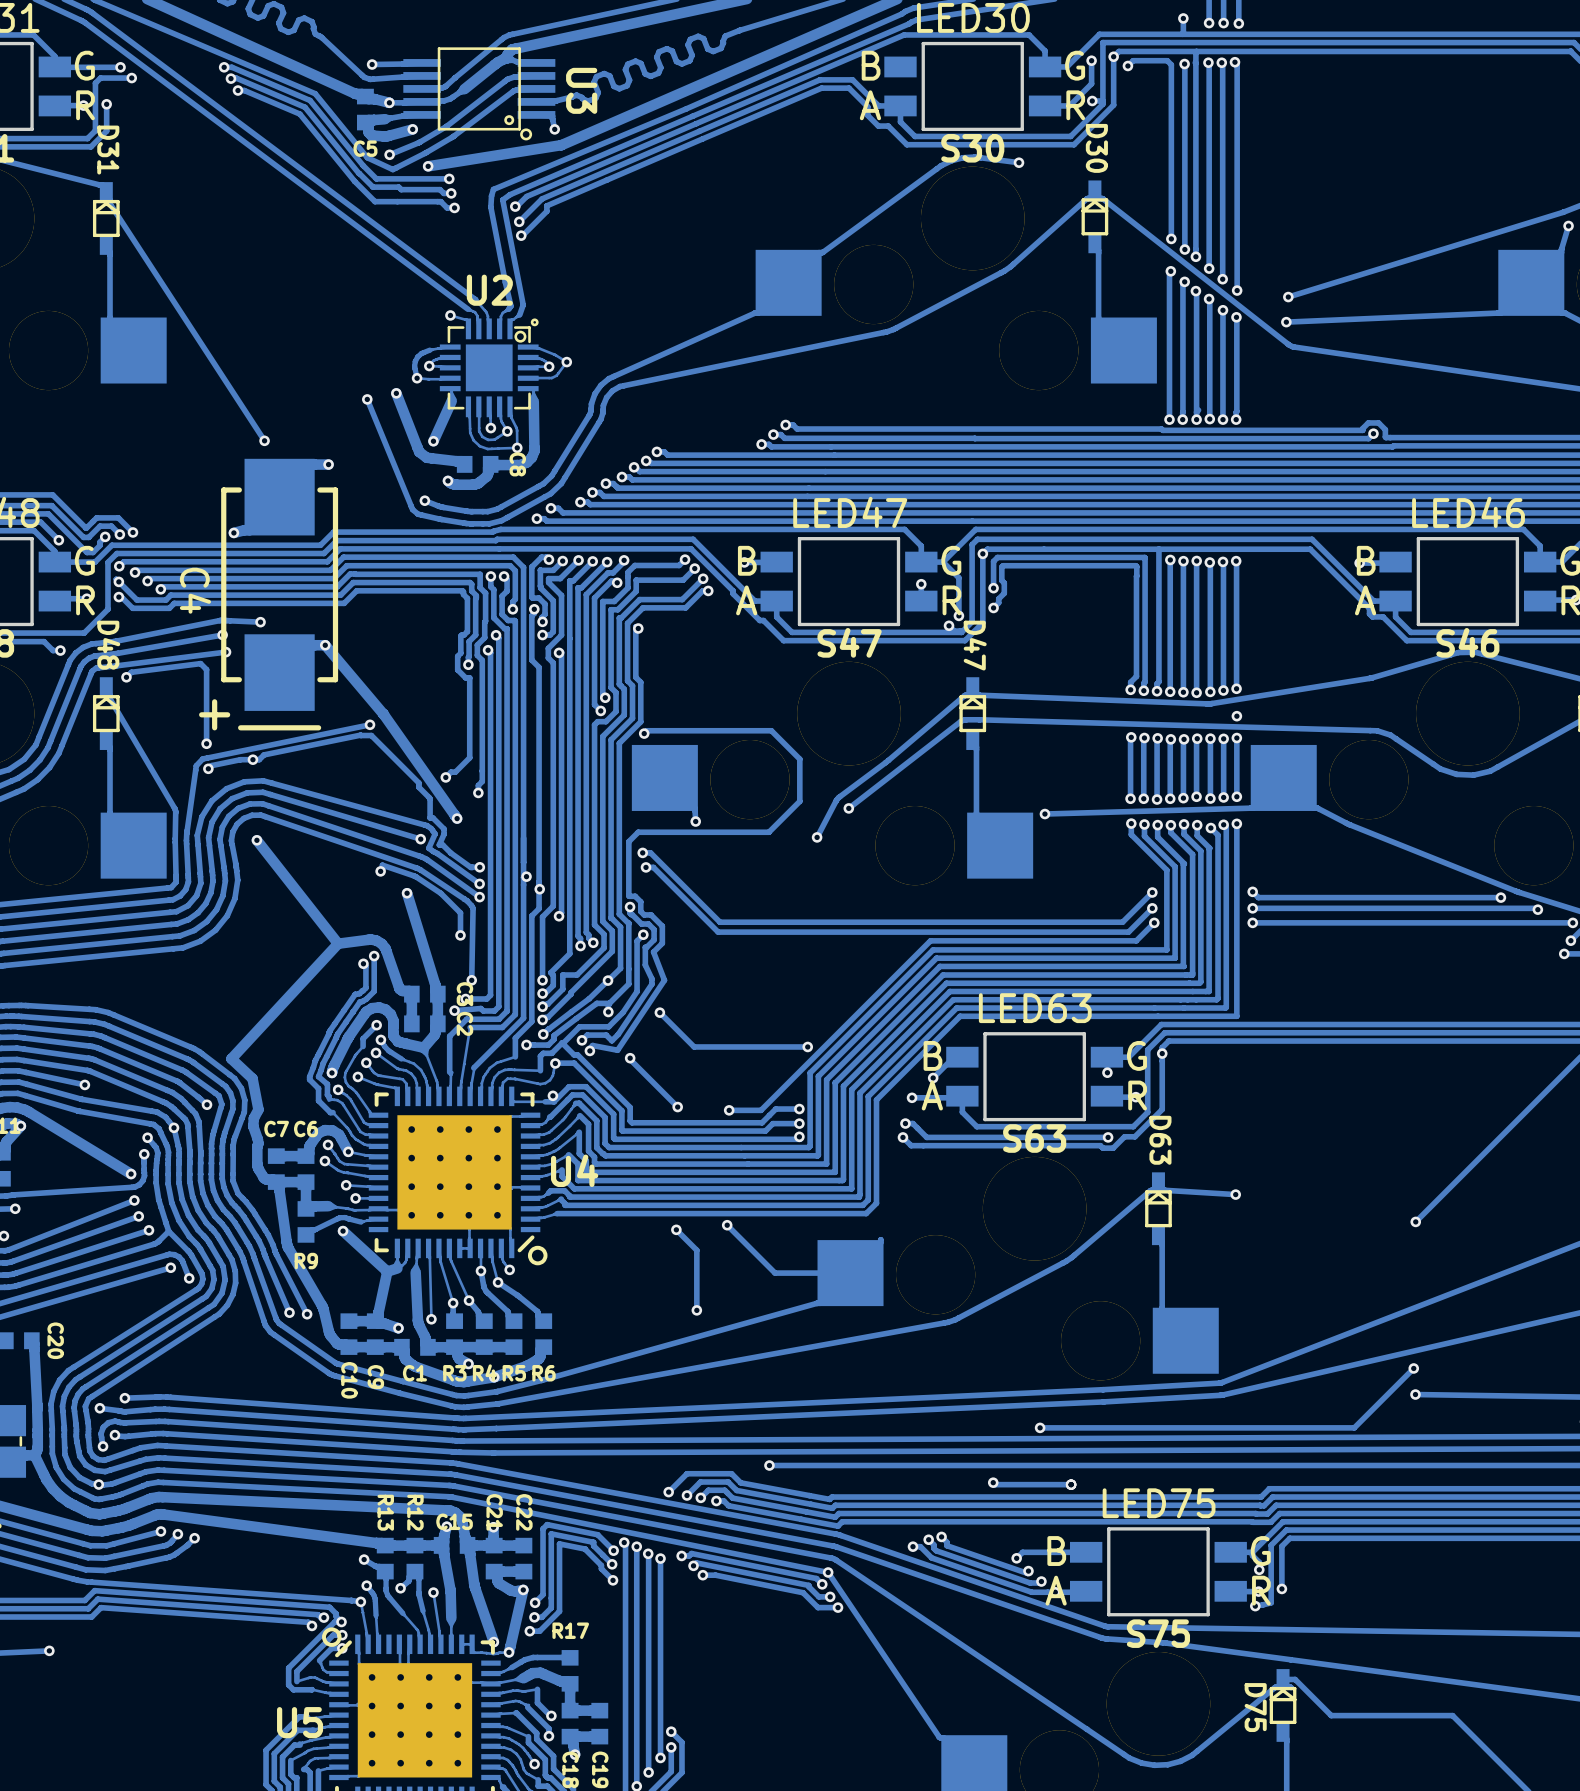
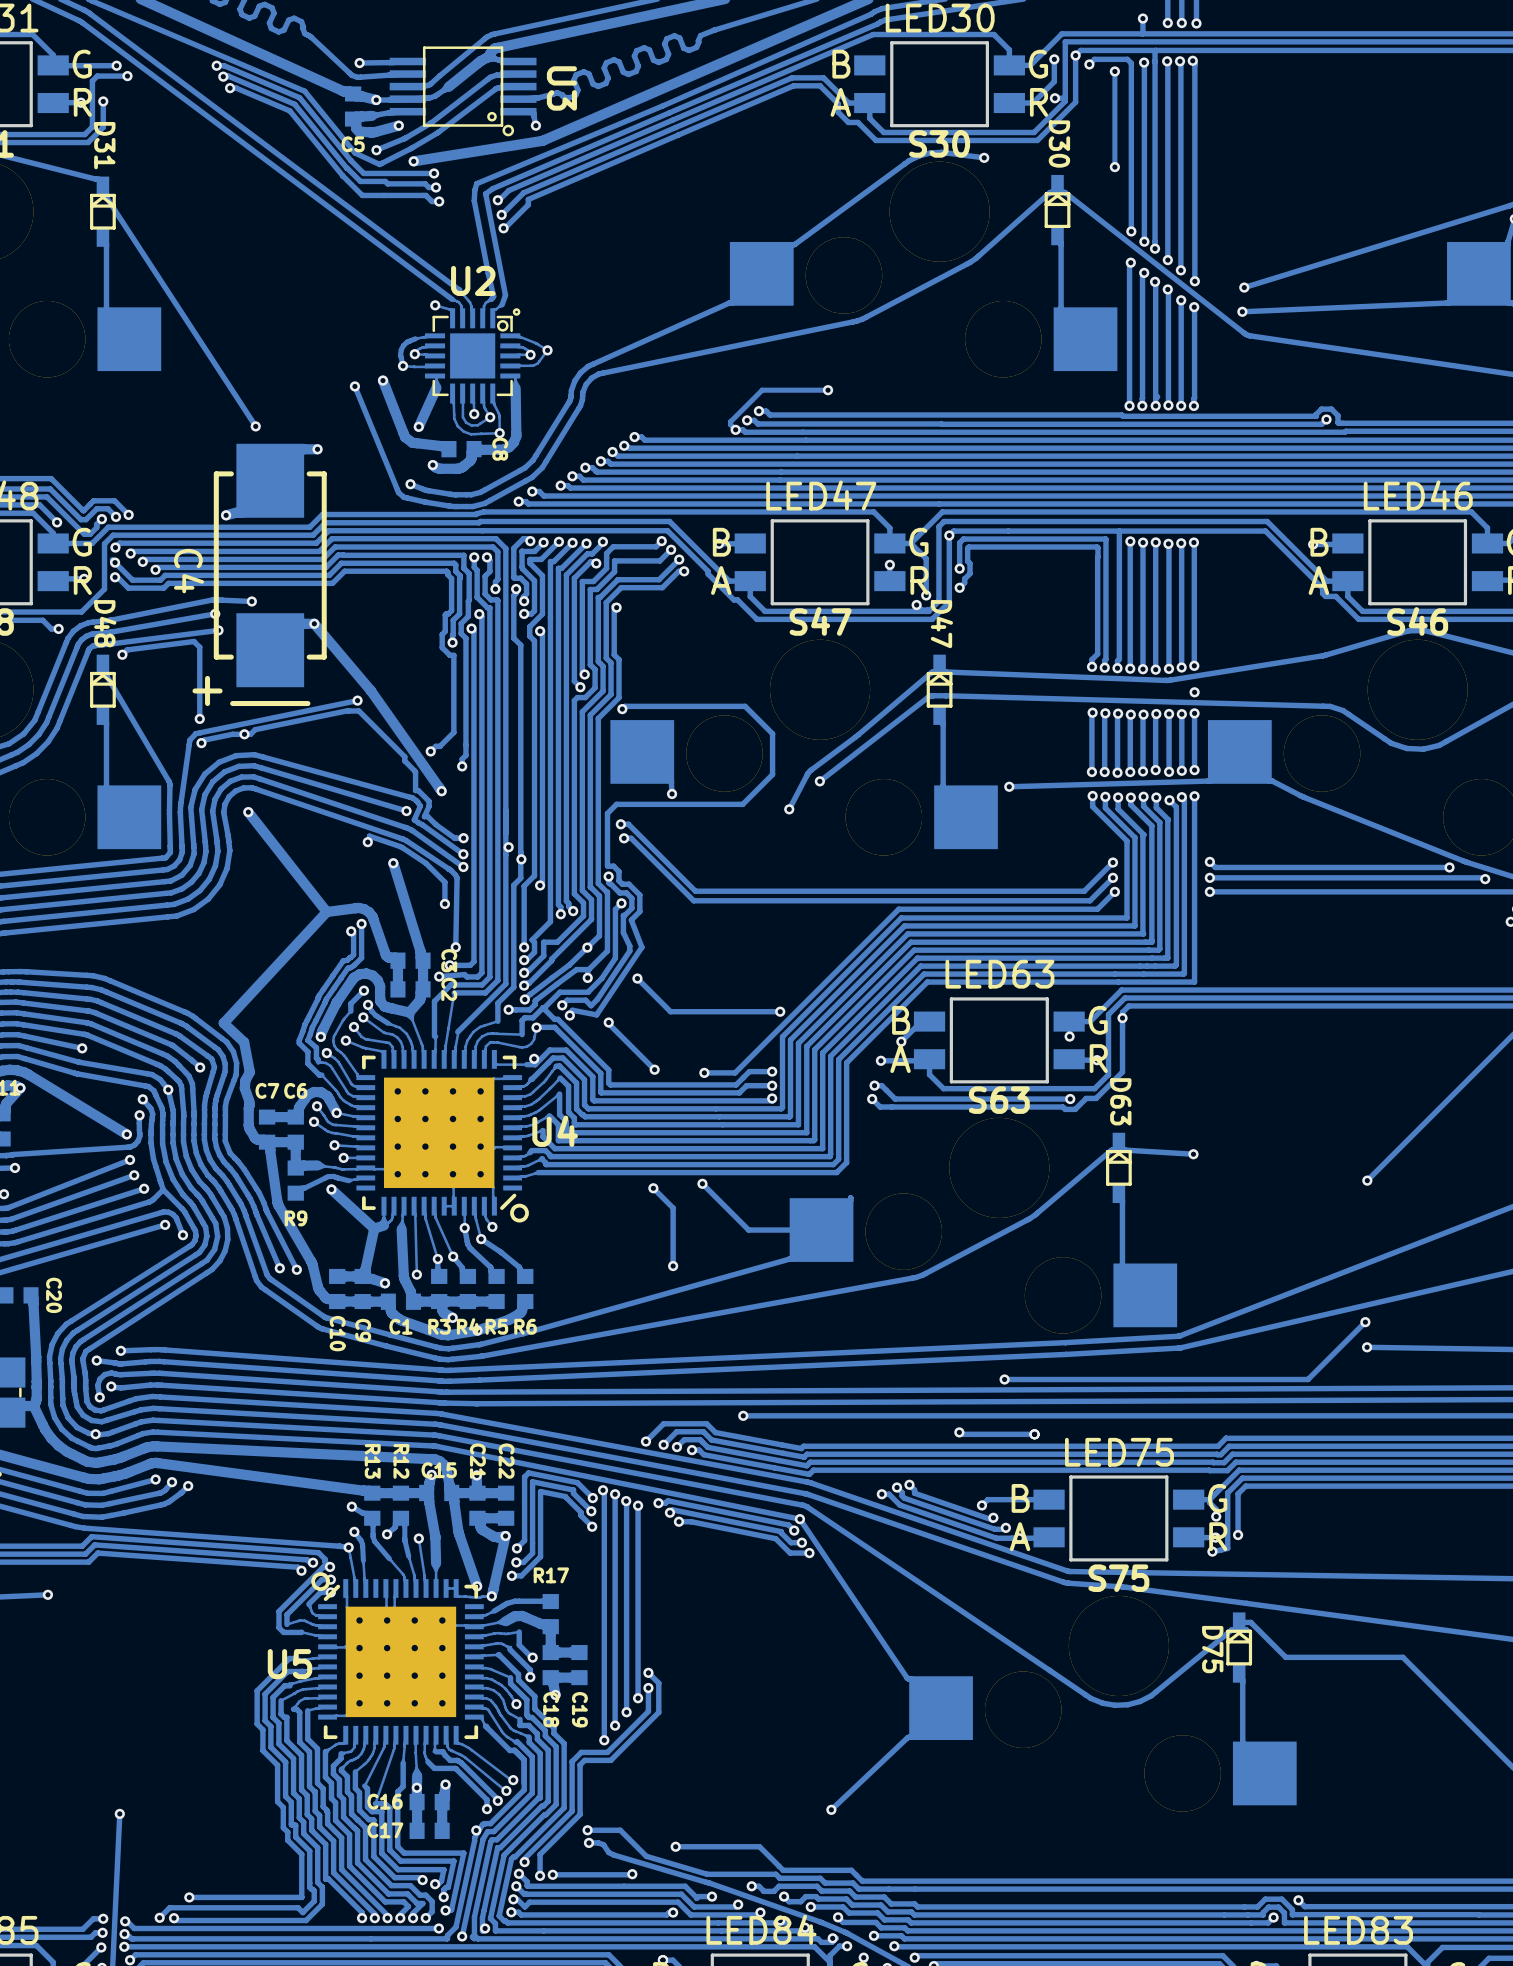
track: none -> (1114, 71) (1114, 167)
via: none -> (1114, 71)
via: none -> (1114, 167)
track: none -> (828, 390) (762, 390) (730, 421) (730, 424) (735, 429)
via: none -> (828, 390)

